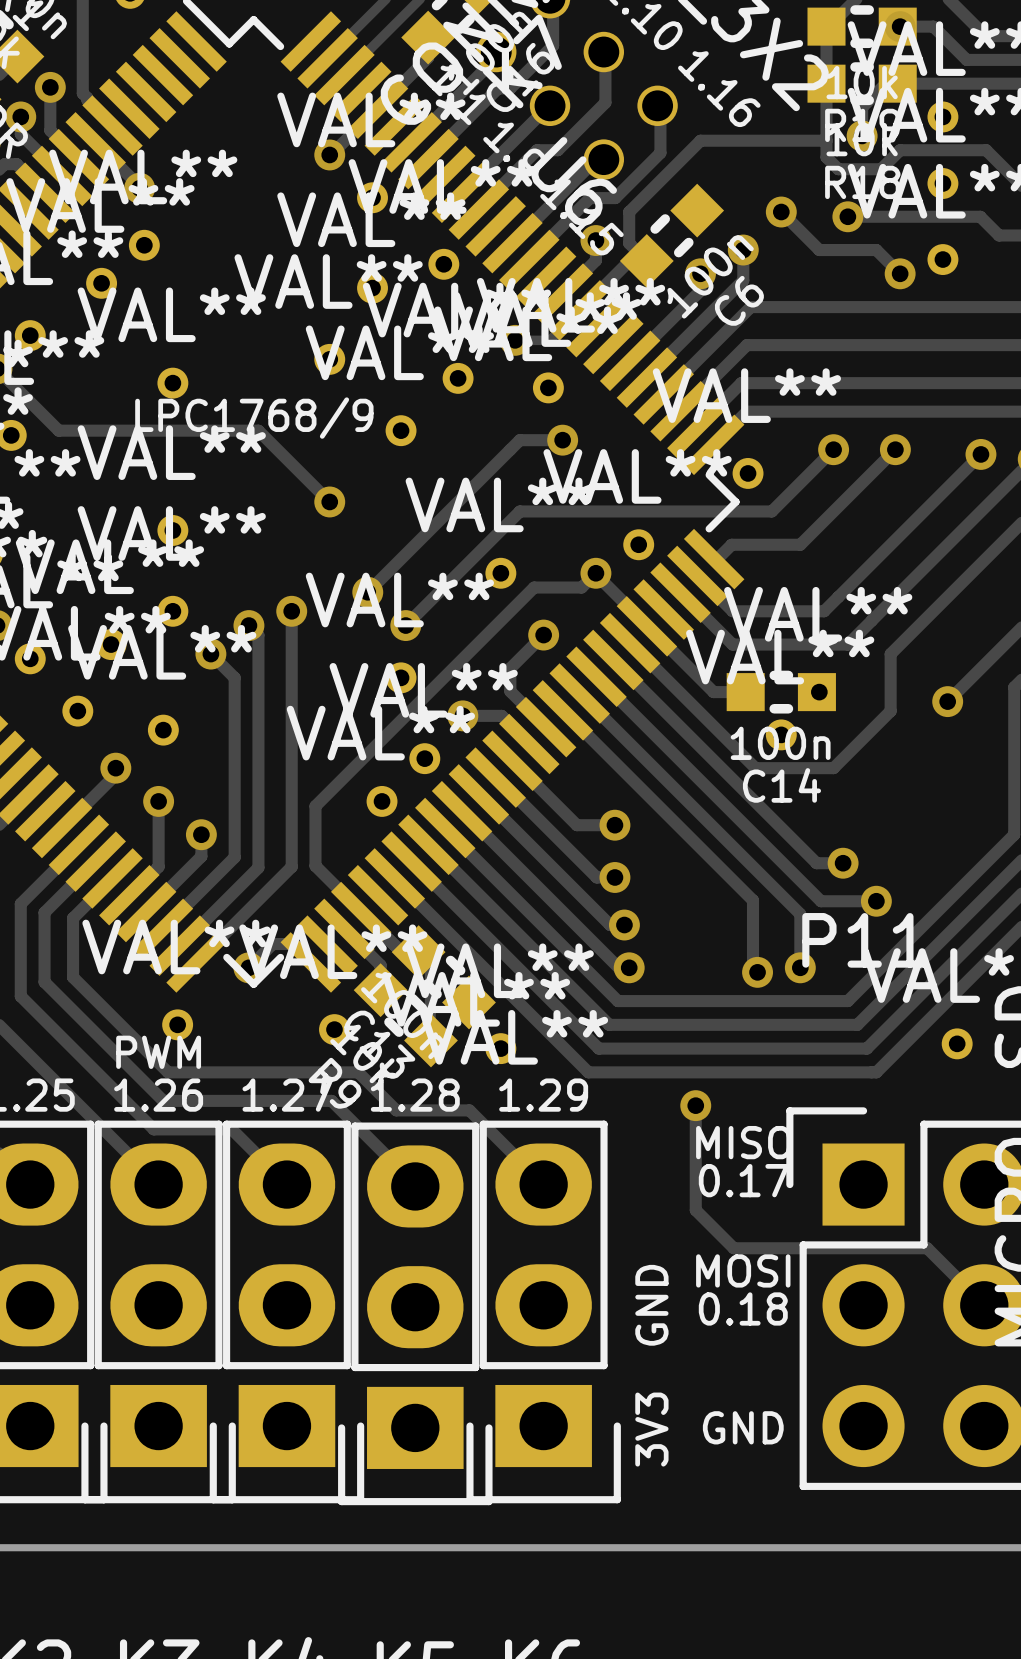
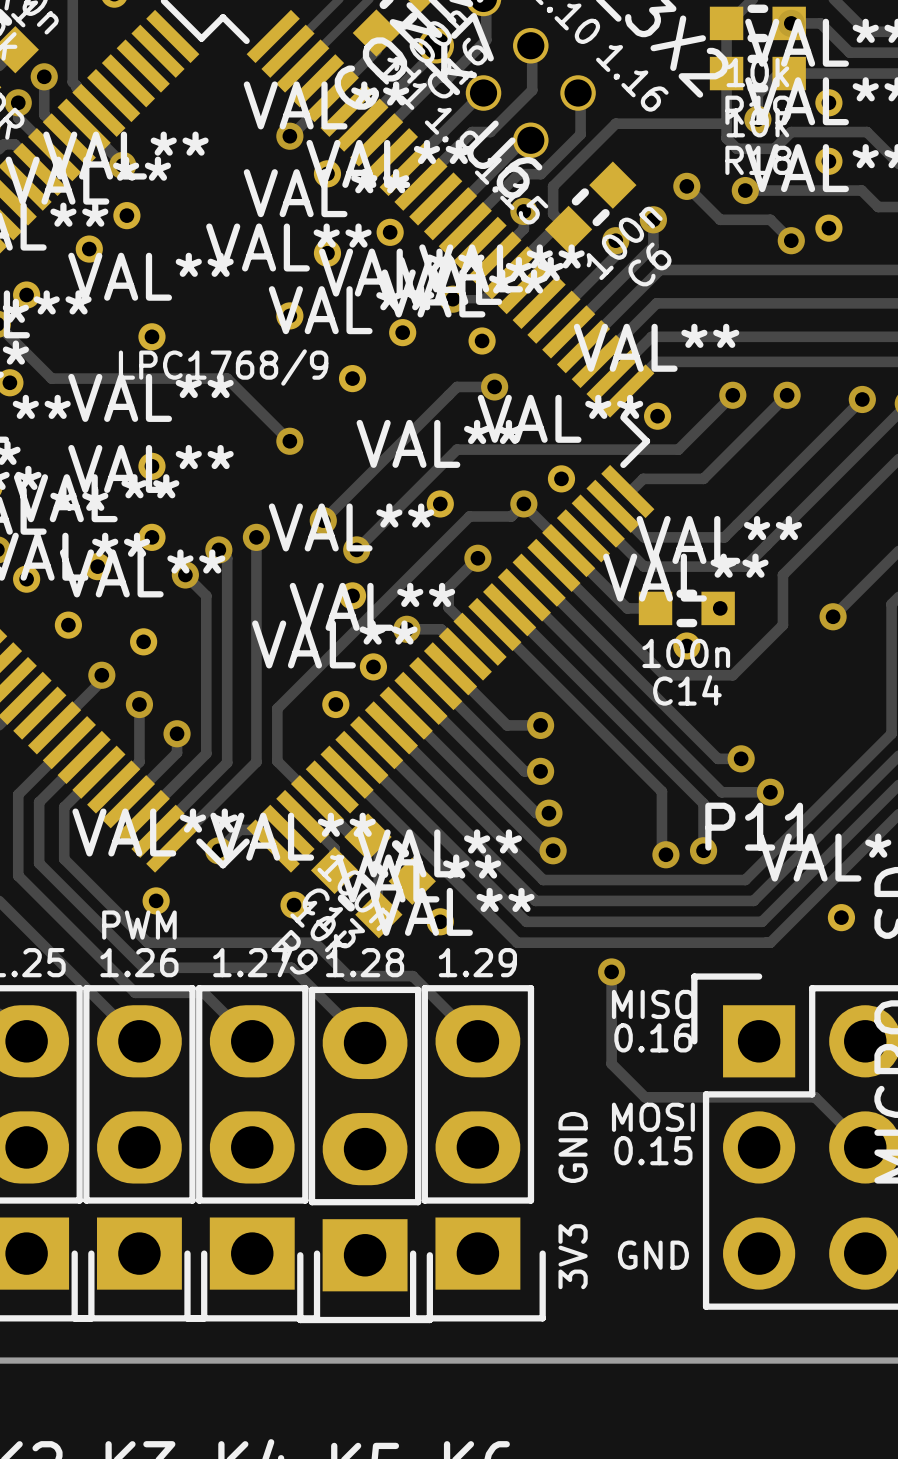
text: 0.17 (743, 1180) -> 0.16 (653, 1037)
text: 0.18 (743, 1308) -> 0.15 (653, 1150)

